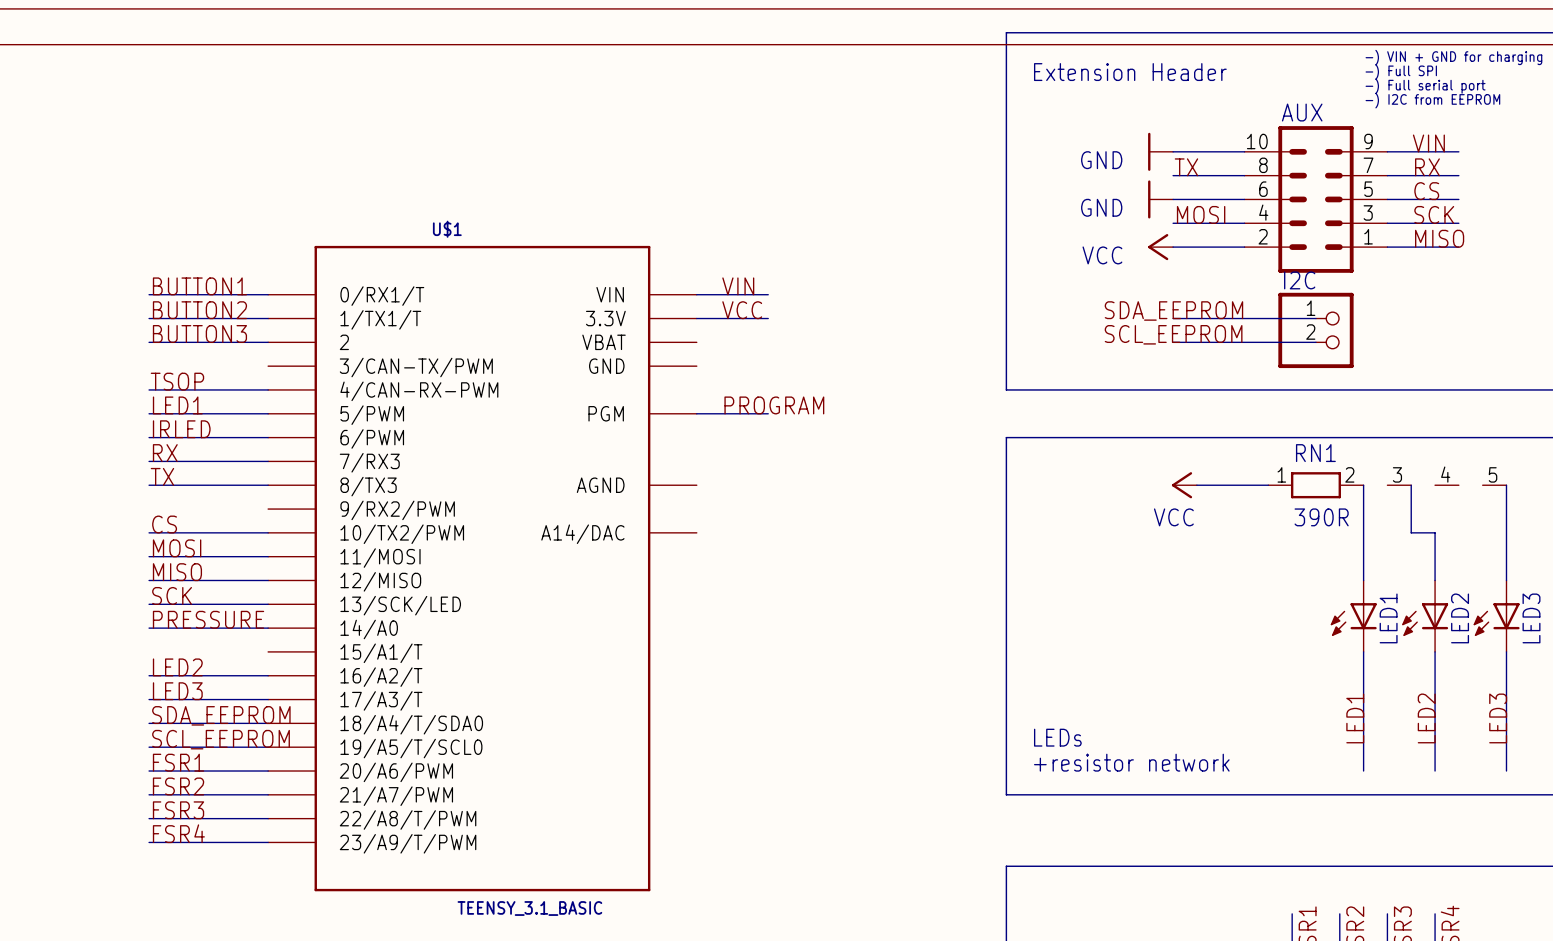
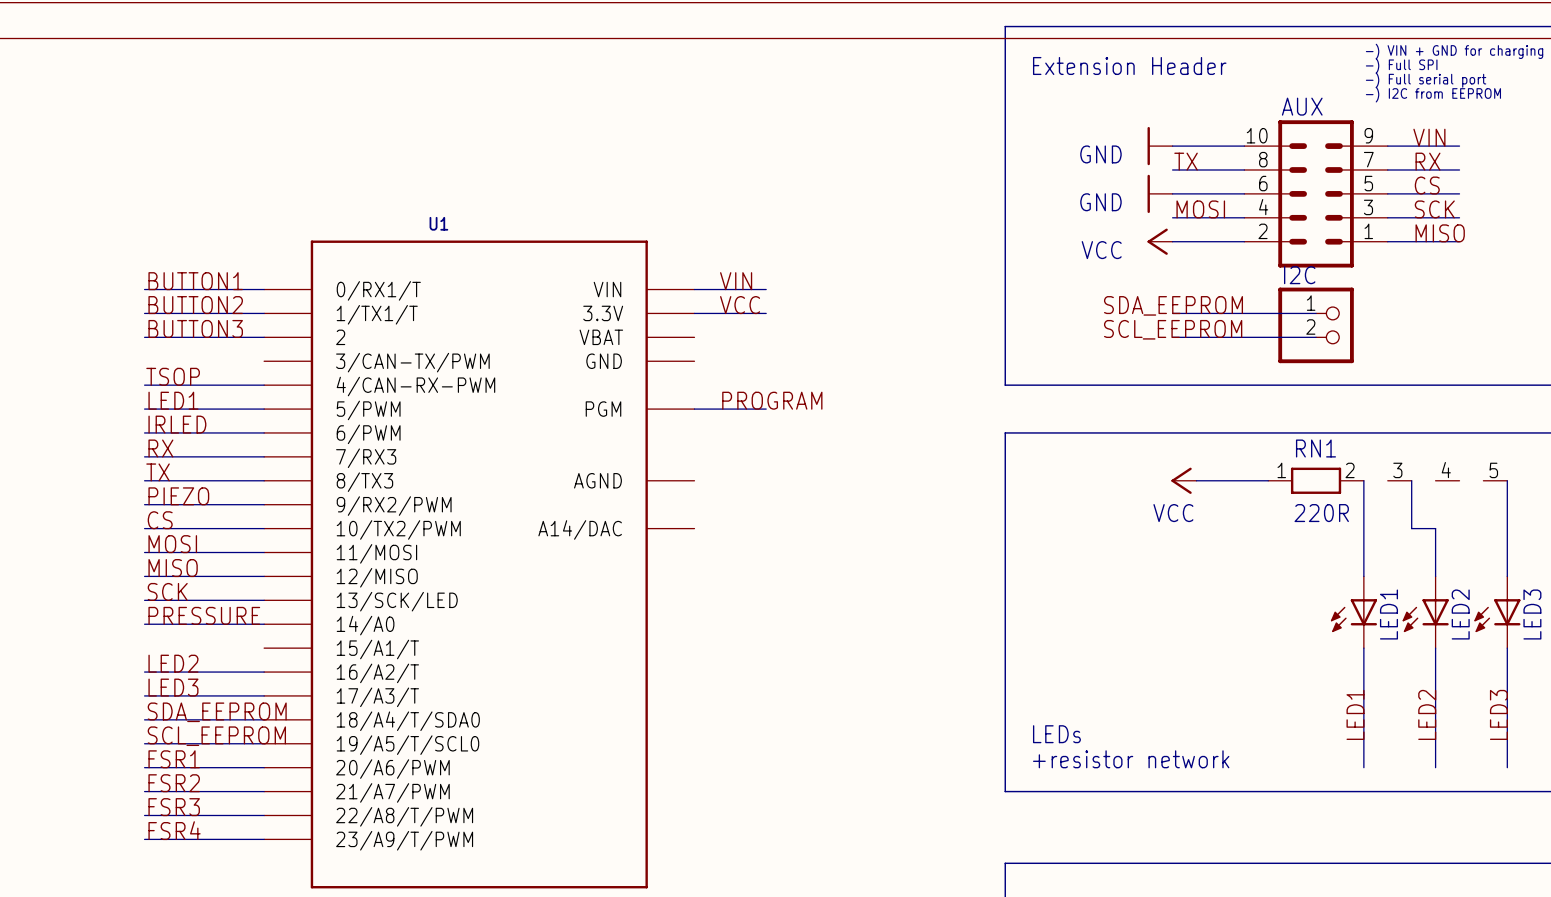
U$1 name: U$1 (447, 229) -> U1 (438, 223)
label: none -> PIEZO (178, 496)
wire: none -> (144, 504) (264, 504)
RN1 value: 390R (1321, 517) -> 220R (1321, 513)

